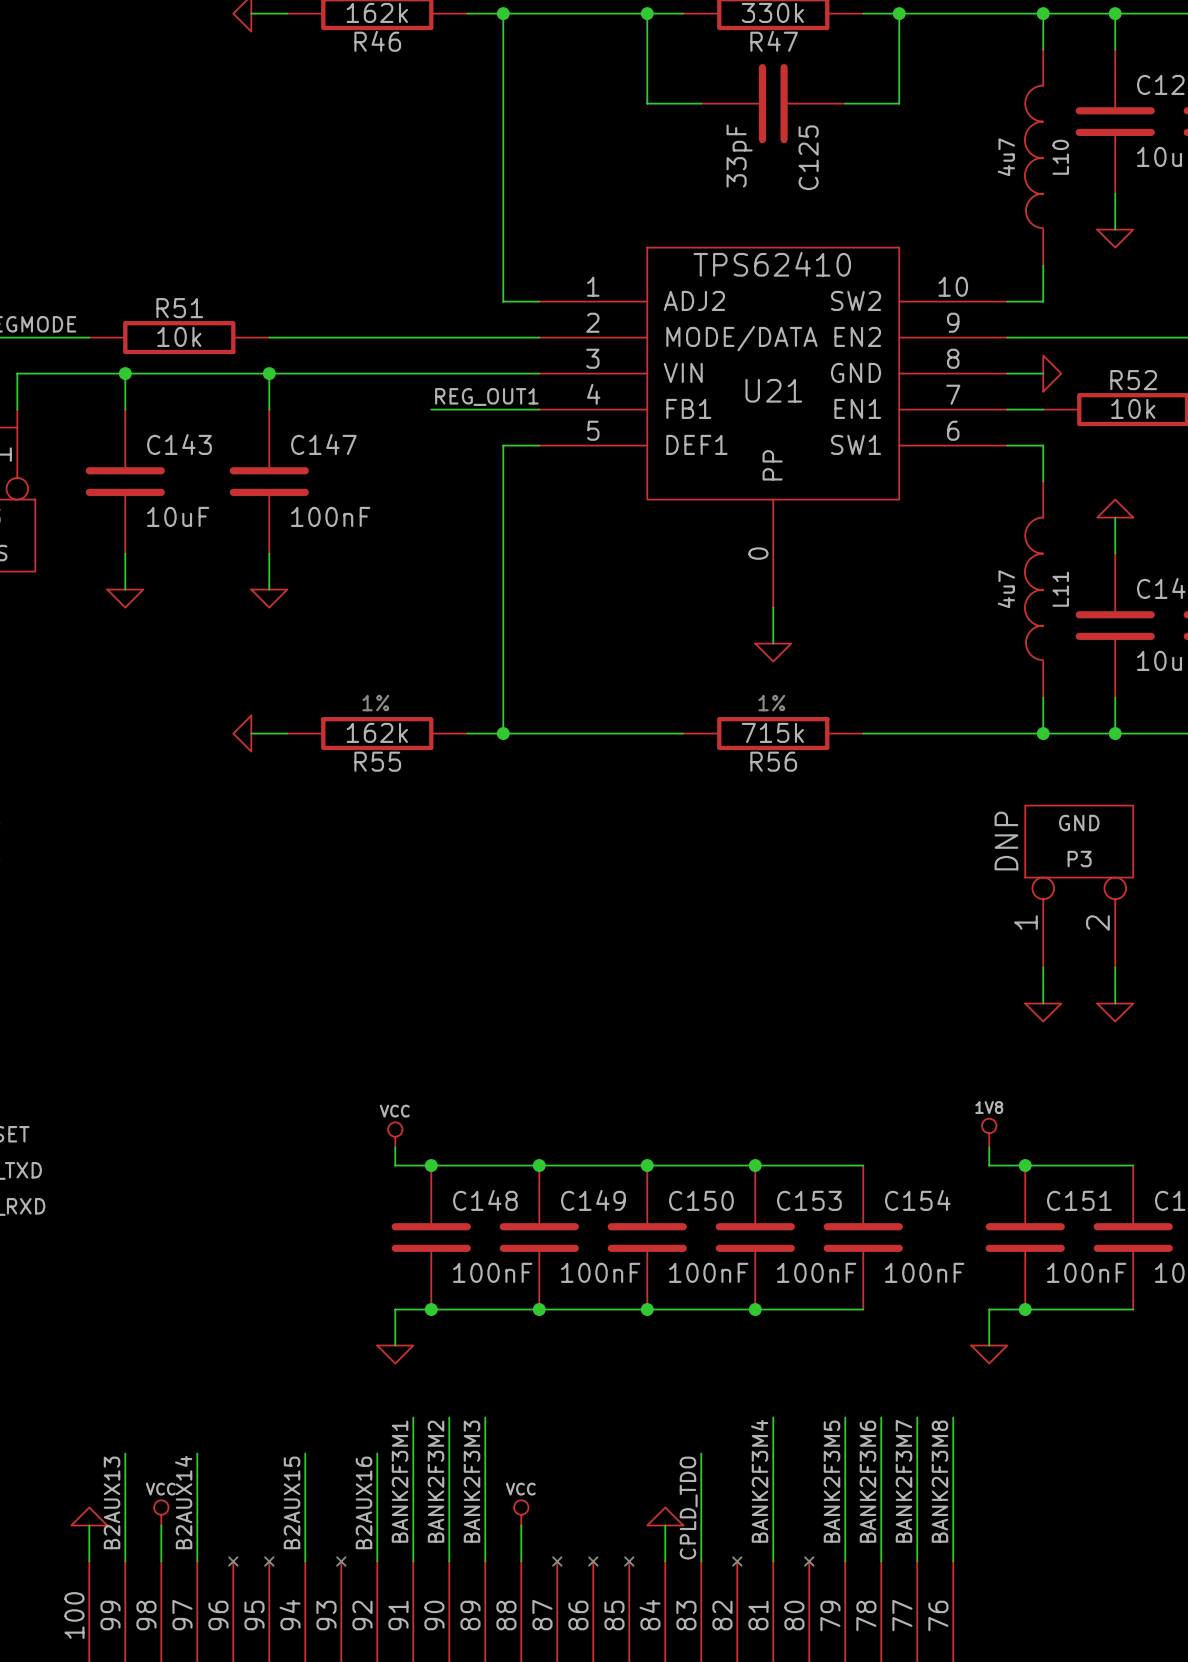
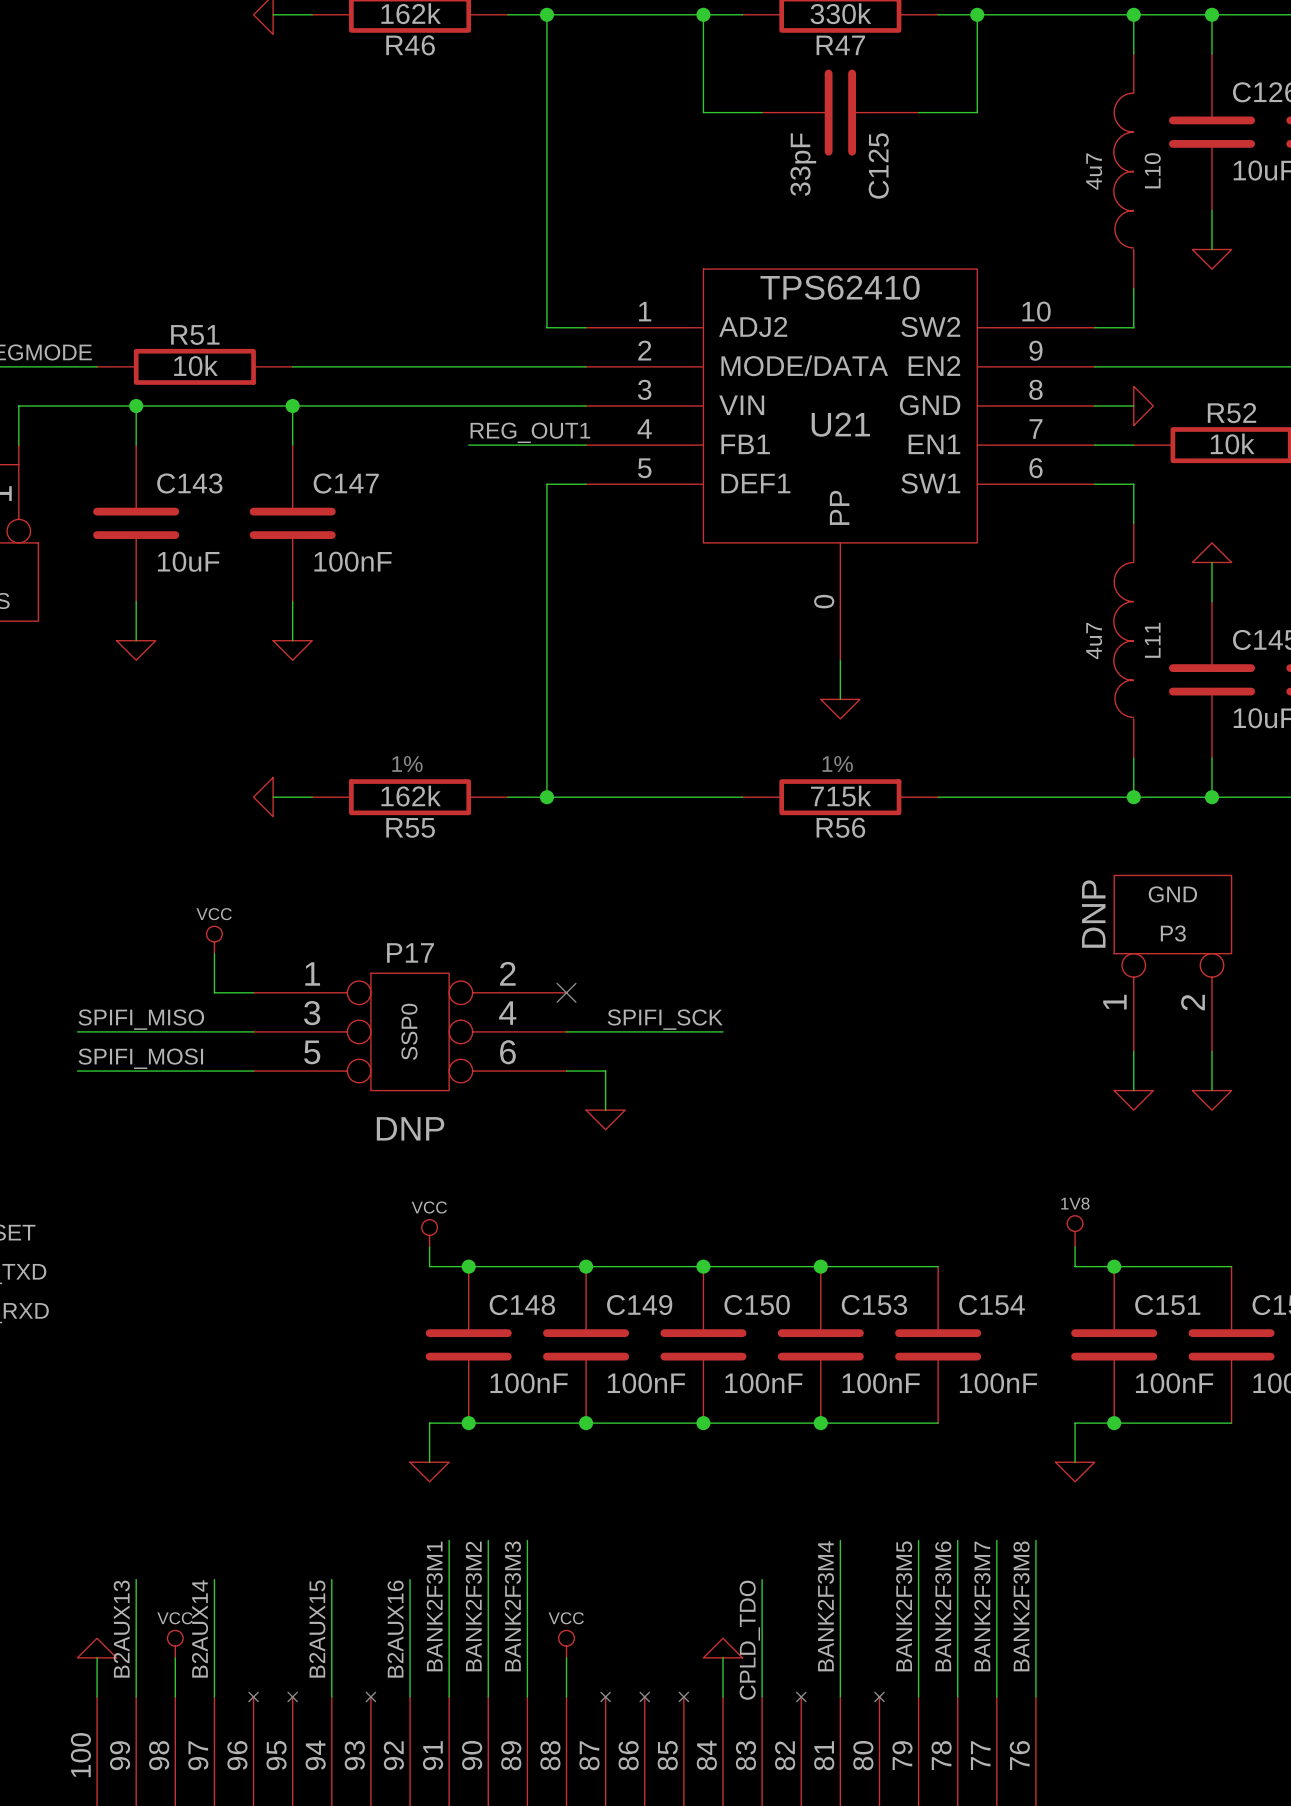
power symbol: none -> VCC (214, 939)
wire: none -> (214, 953) (214, 992) (253, 992)
no-connect mark: none -> (566, 992)
label: none -> SPIFI_MISO (141, 1019)
label: none -> SPIFI_SCK (665, 1019)
wire: none -> (77, 1031) (253, 1031)
P17: none -> SSP0 (410, 1031)
wire: none -> (566, 1031) (722, 1031)
label: none -> SPIFI_MOSI (140, 1058)
wire: none -> (77, 1071) (253, 1071)
wire: none -> (566, 1071) (605, 1071) (605, 1110)
power symbol: none -> (605, 1119)

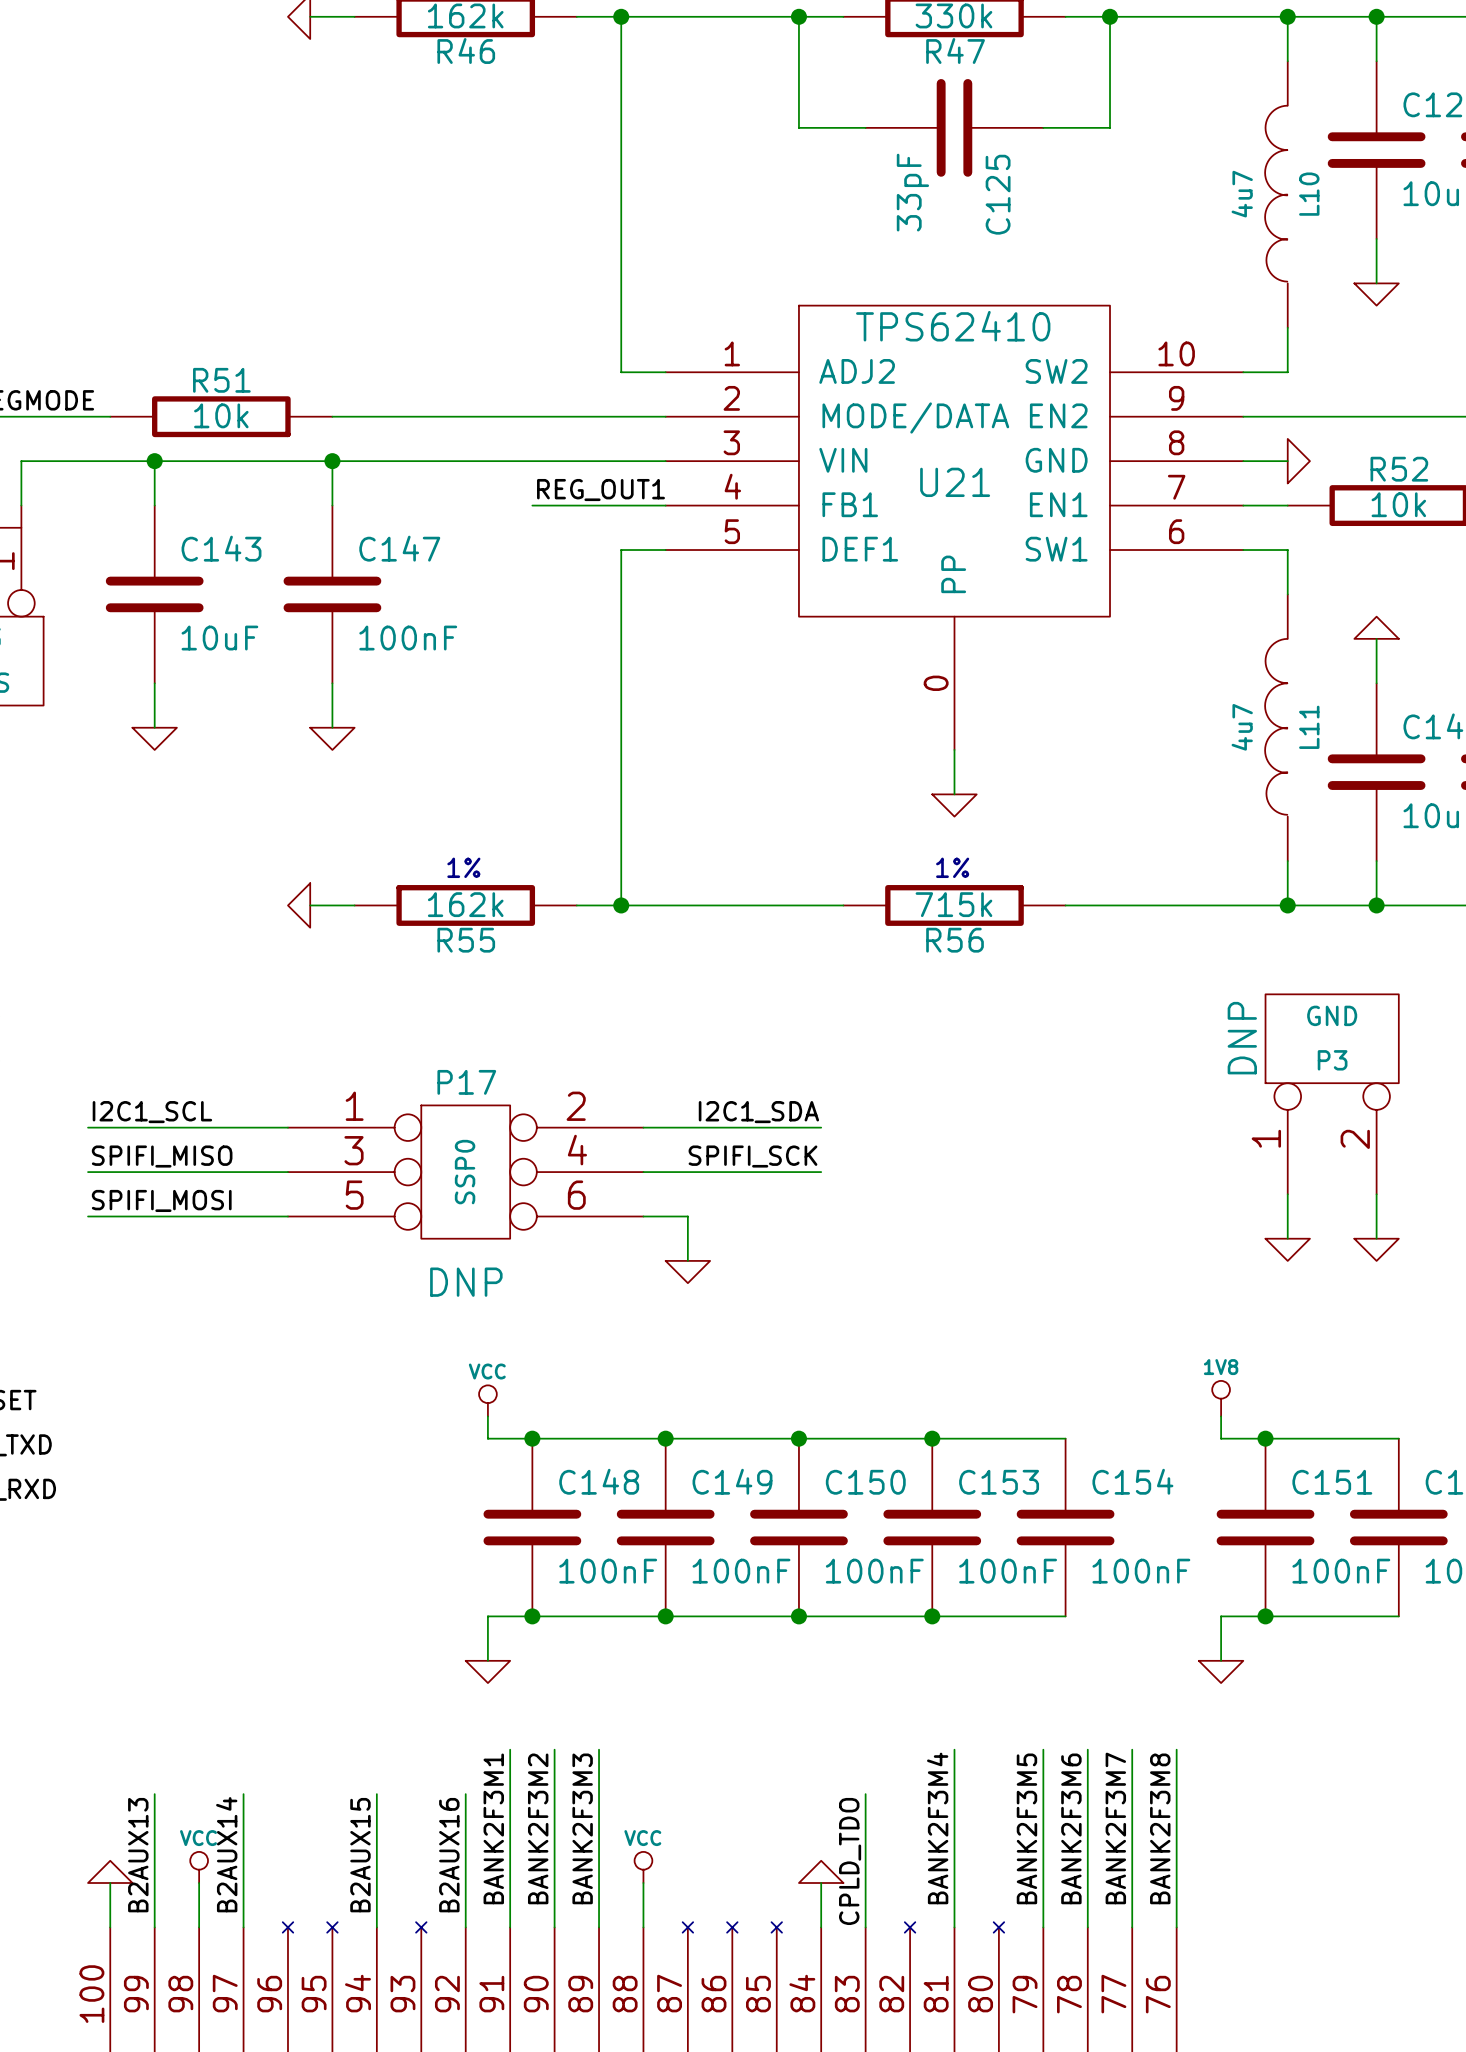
power symbol: VCC (214, 939) -> none
wire: (214, 953) (214, 992) -> (88, 1127) (243, 1127)
label: none -> I2C1_SCL (152, 1112)
label: none -> I2C1_SDA (758, 1112)
wire: none -> (643, 1127) (821, 1127)
no-connect mark: (566, 992) -> none

